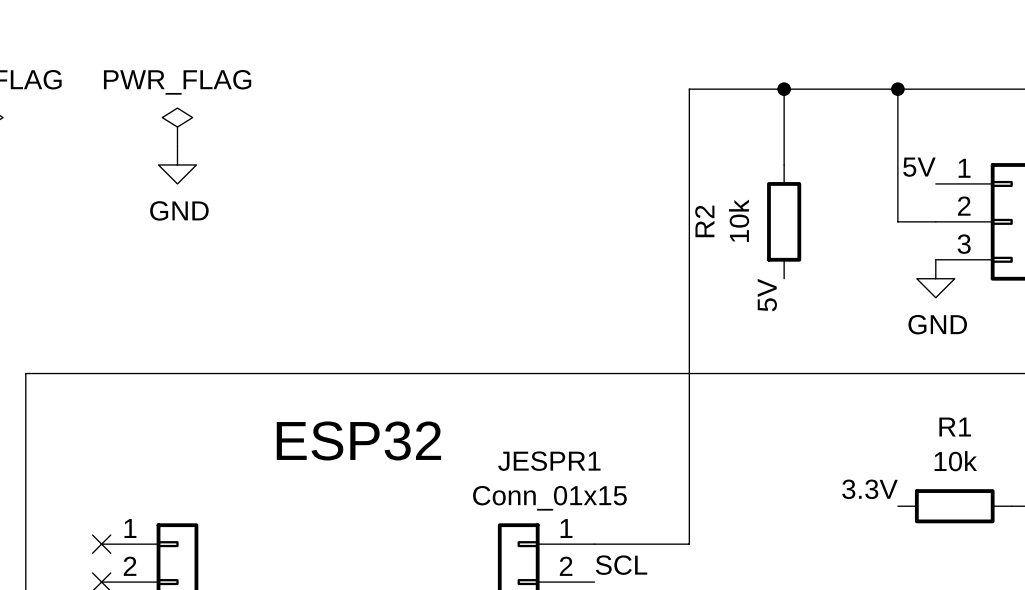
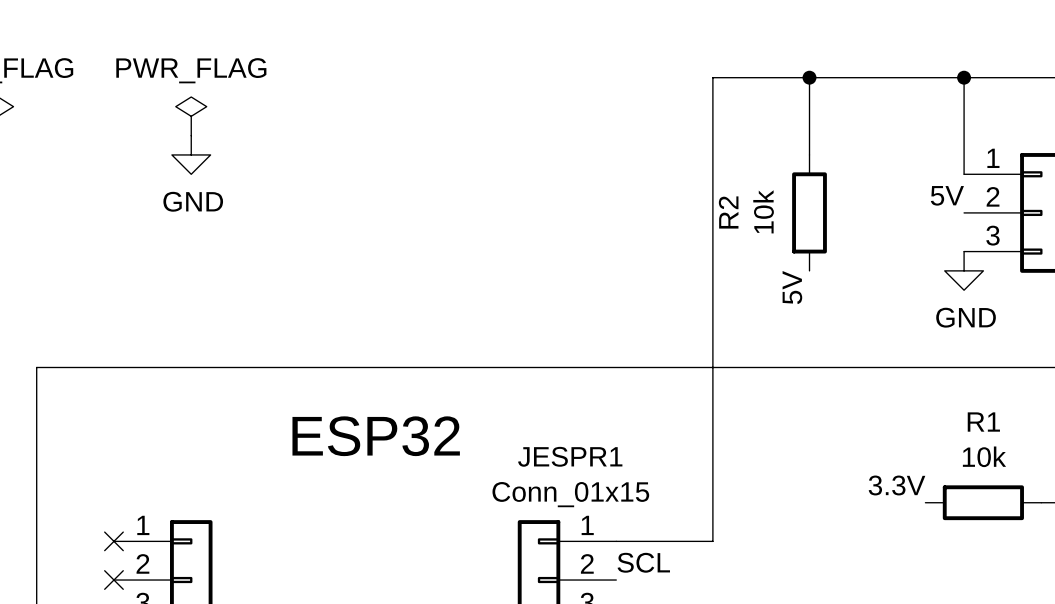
wire: (897, 89) (897, 221) (935, 221) -> none
junction position: (897, 89) -> (964, 77)
wire: none -> (964, 77) (964, 174)
label position: 5V (919, 167) -> 5V (947, 195)

